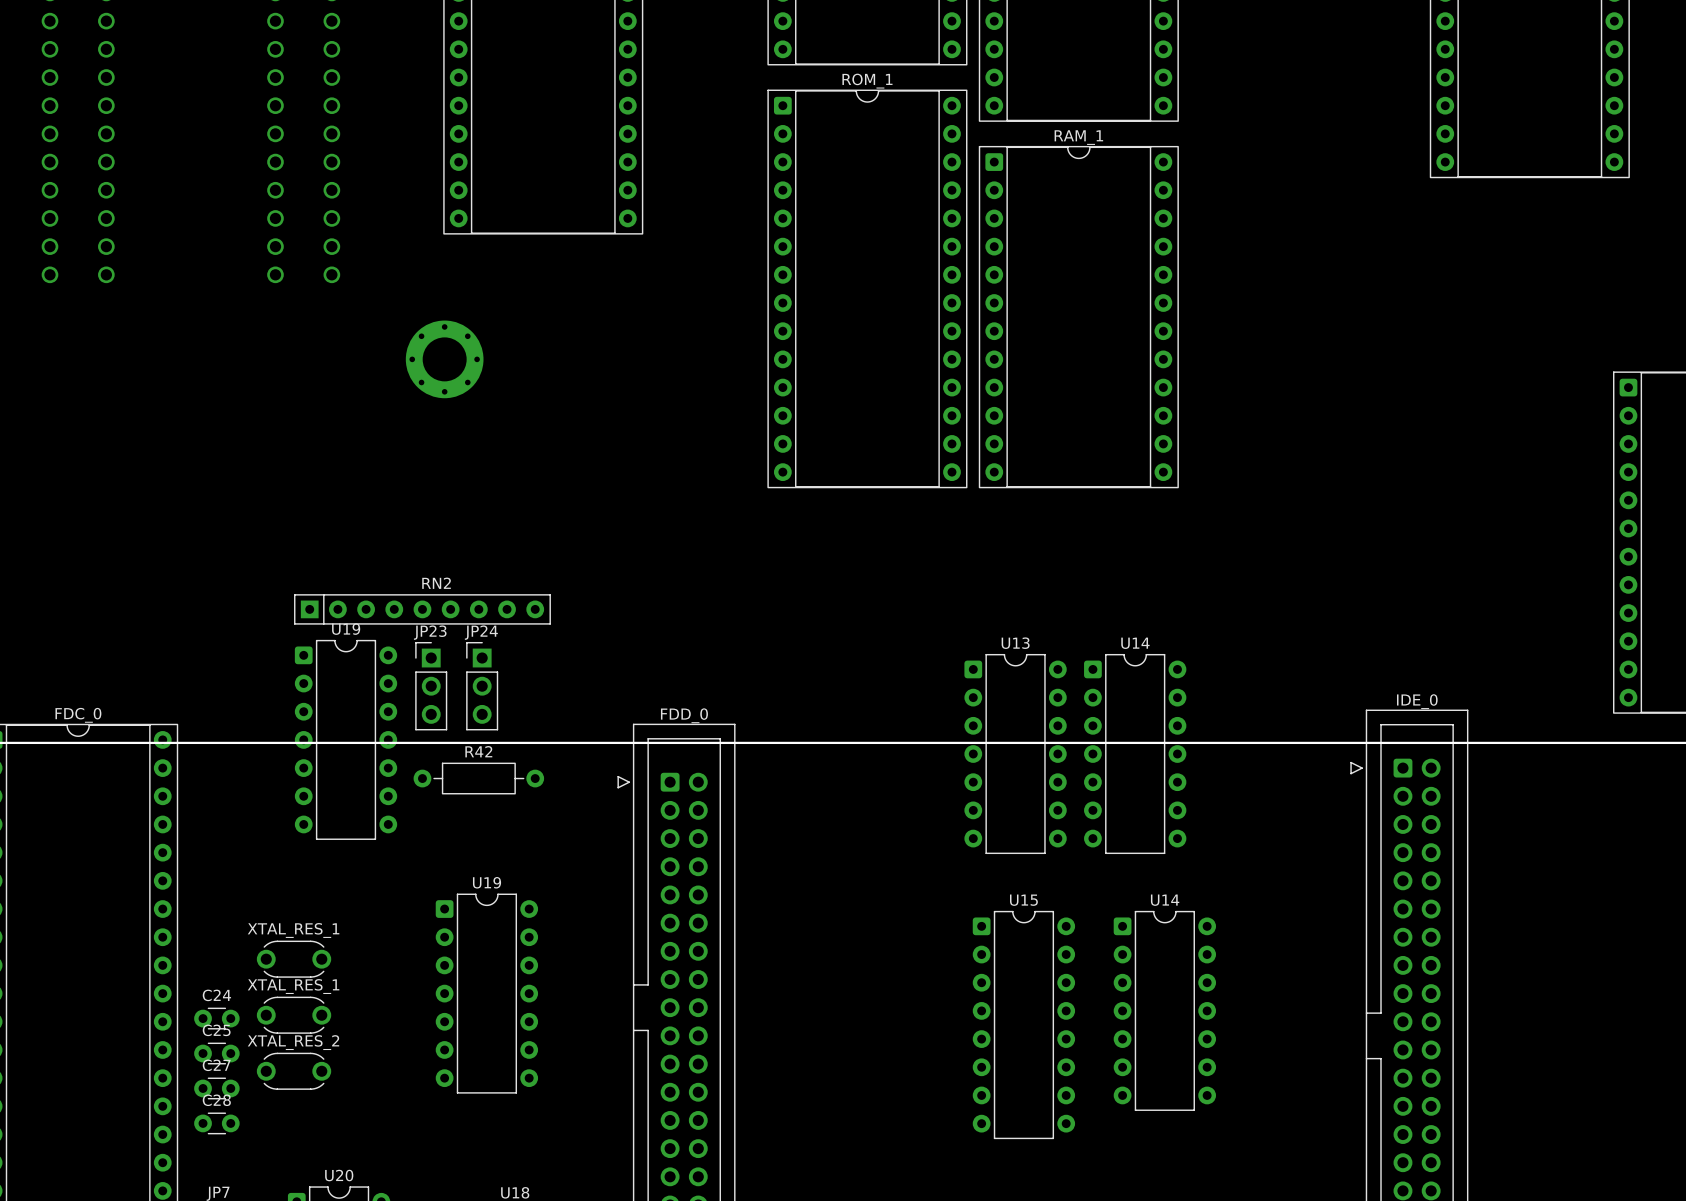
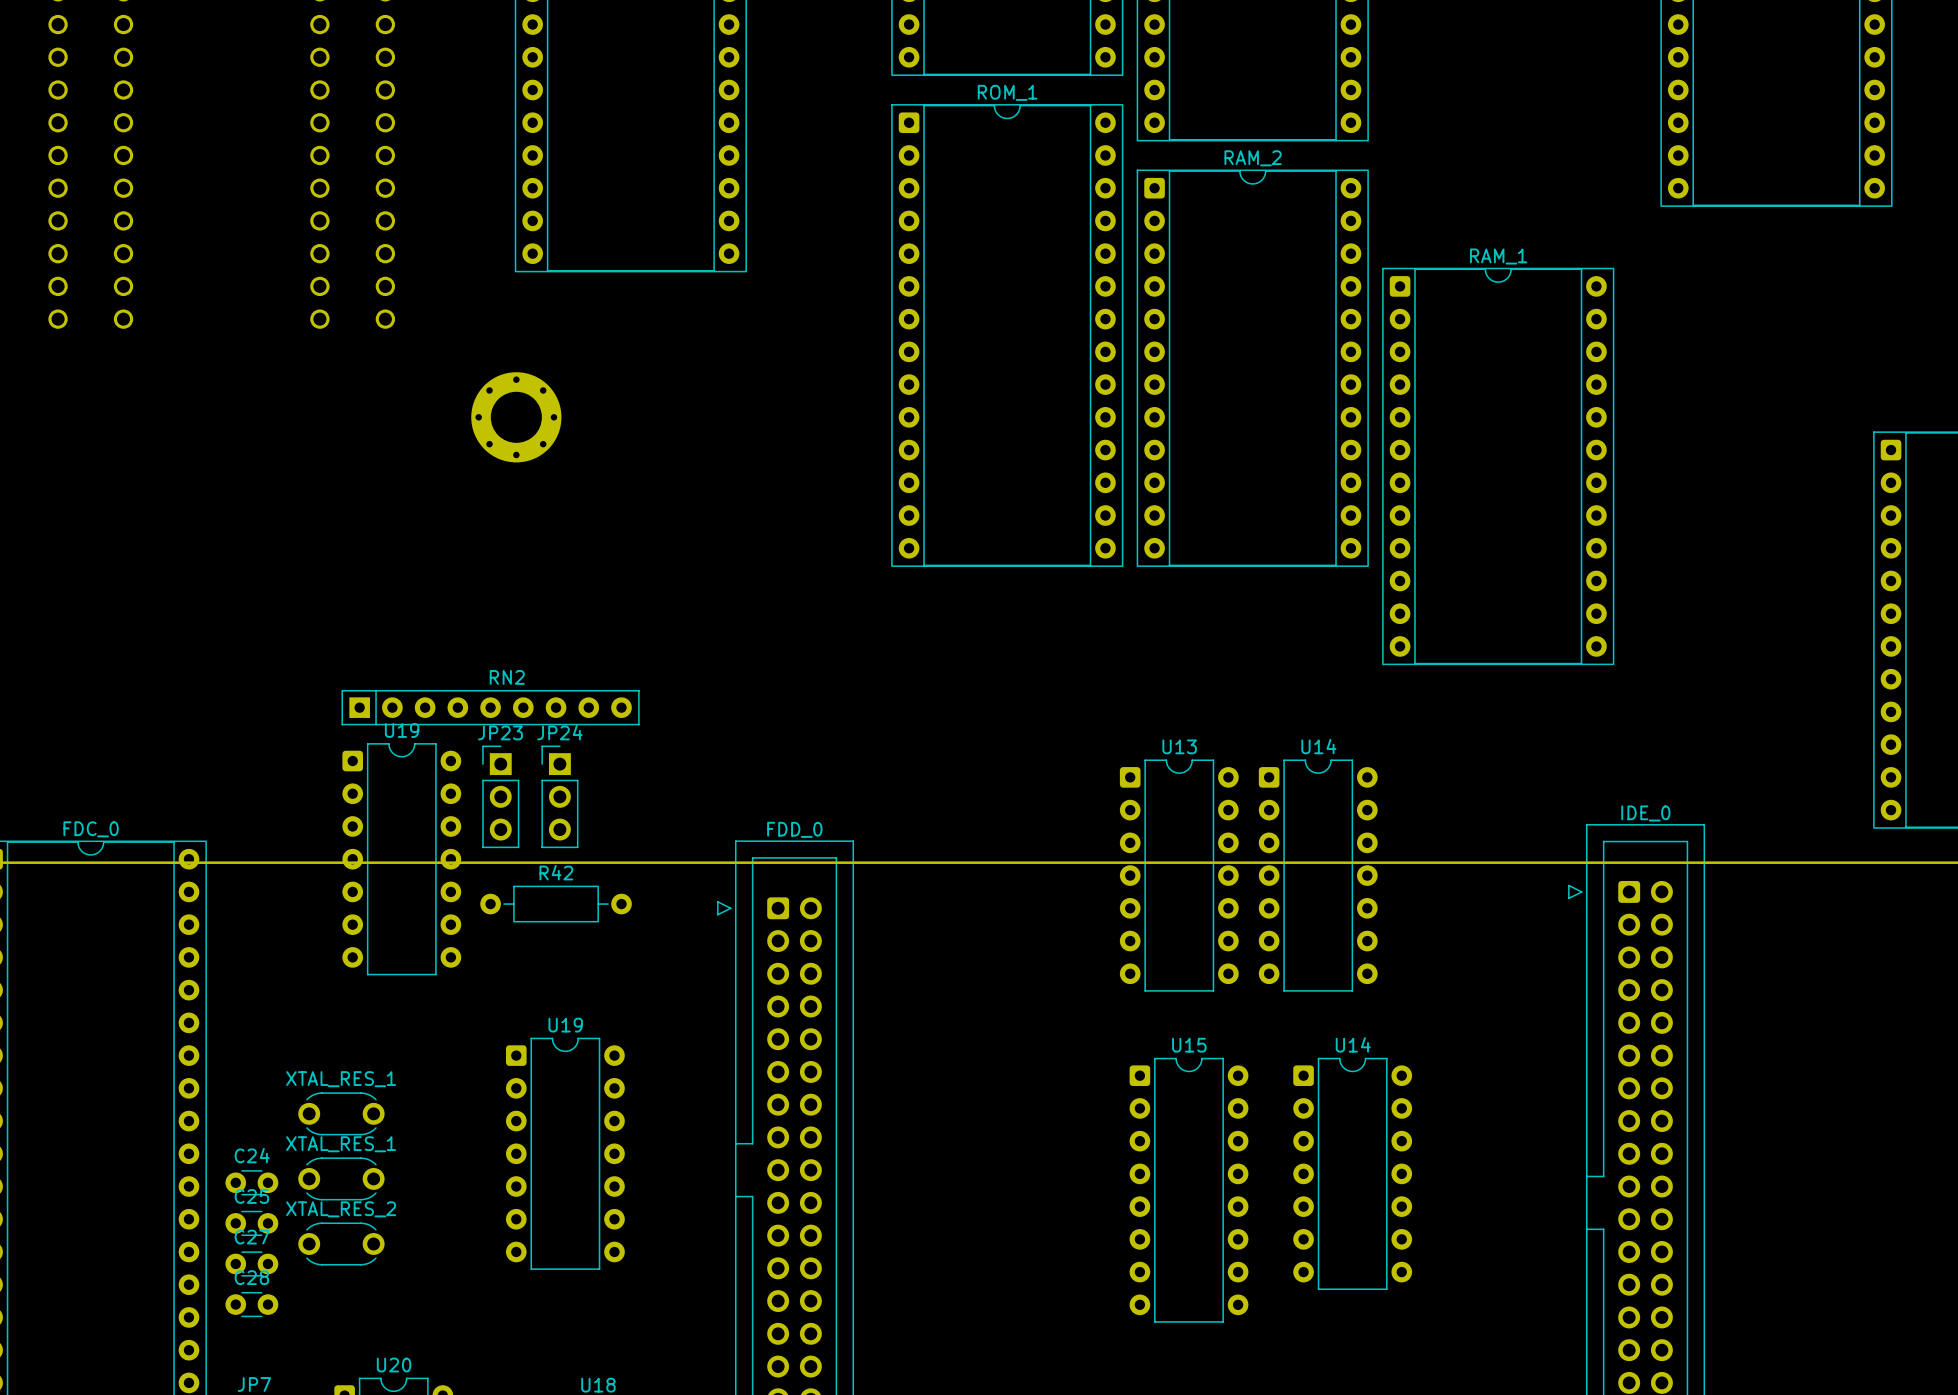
RAM_1 name: RAM_1 (1078, 137) -> RAM_2 (1253, 158)
RAM_1: none -> (1498, 466)

